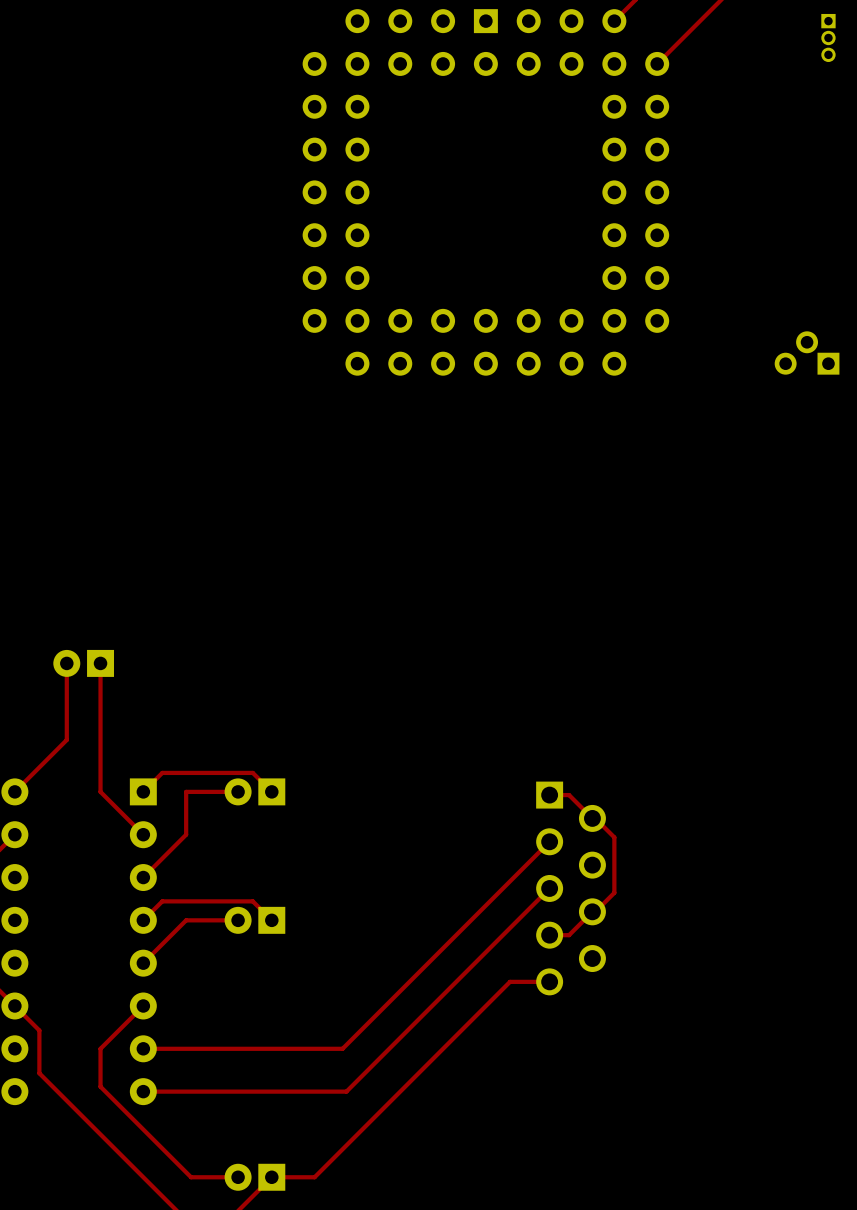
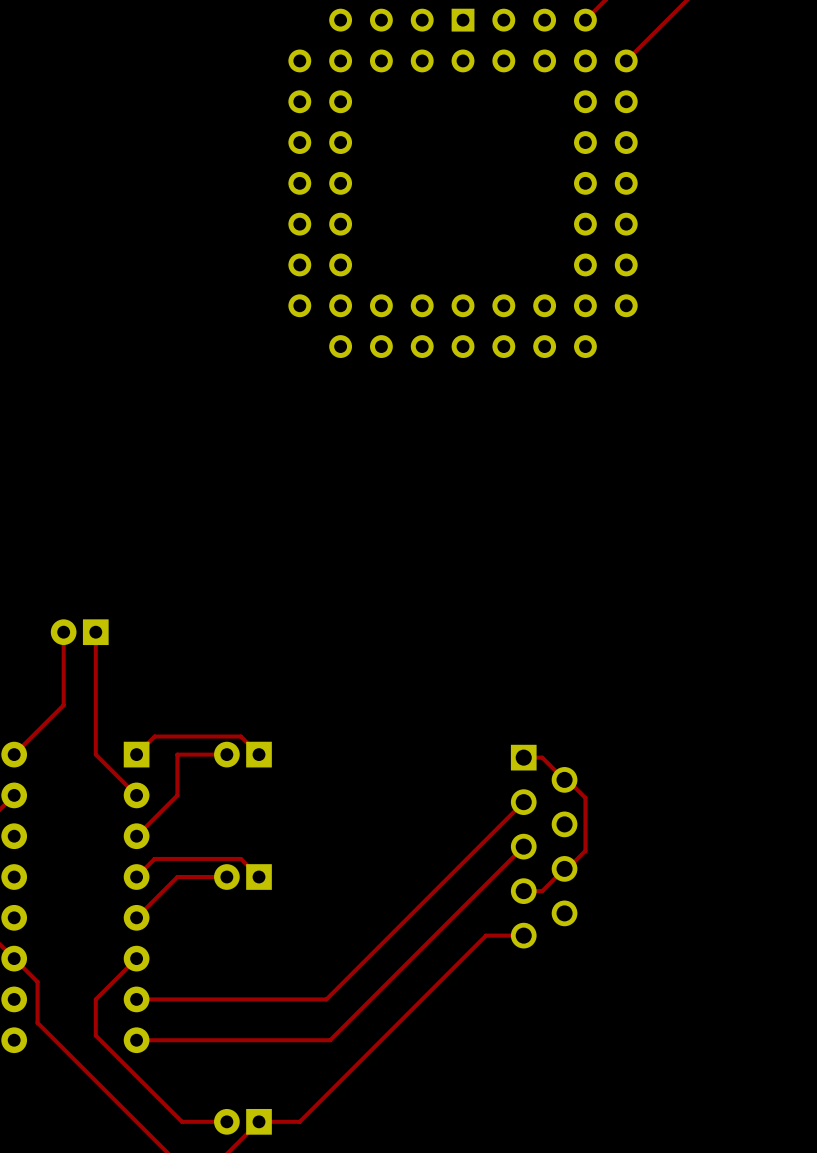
part: (828, 37) -> none
part: (807, 352) -> none

